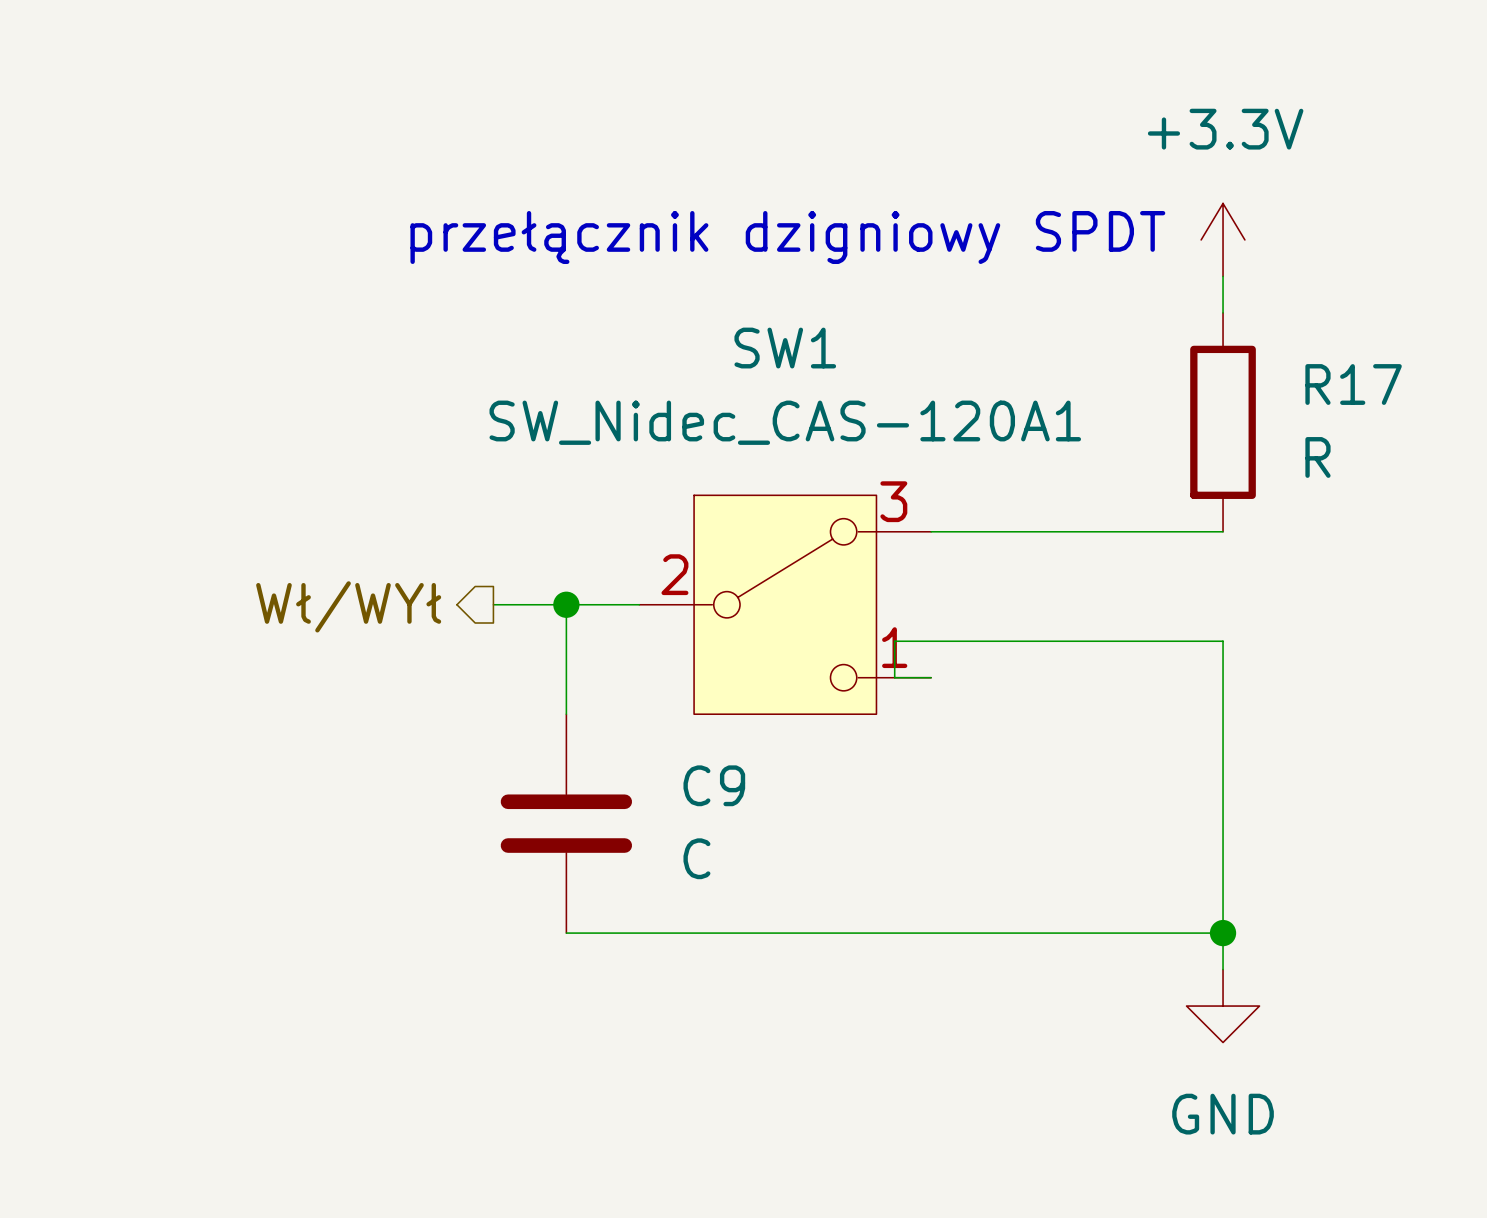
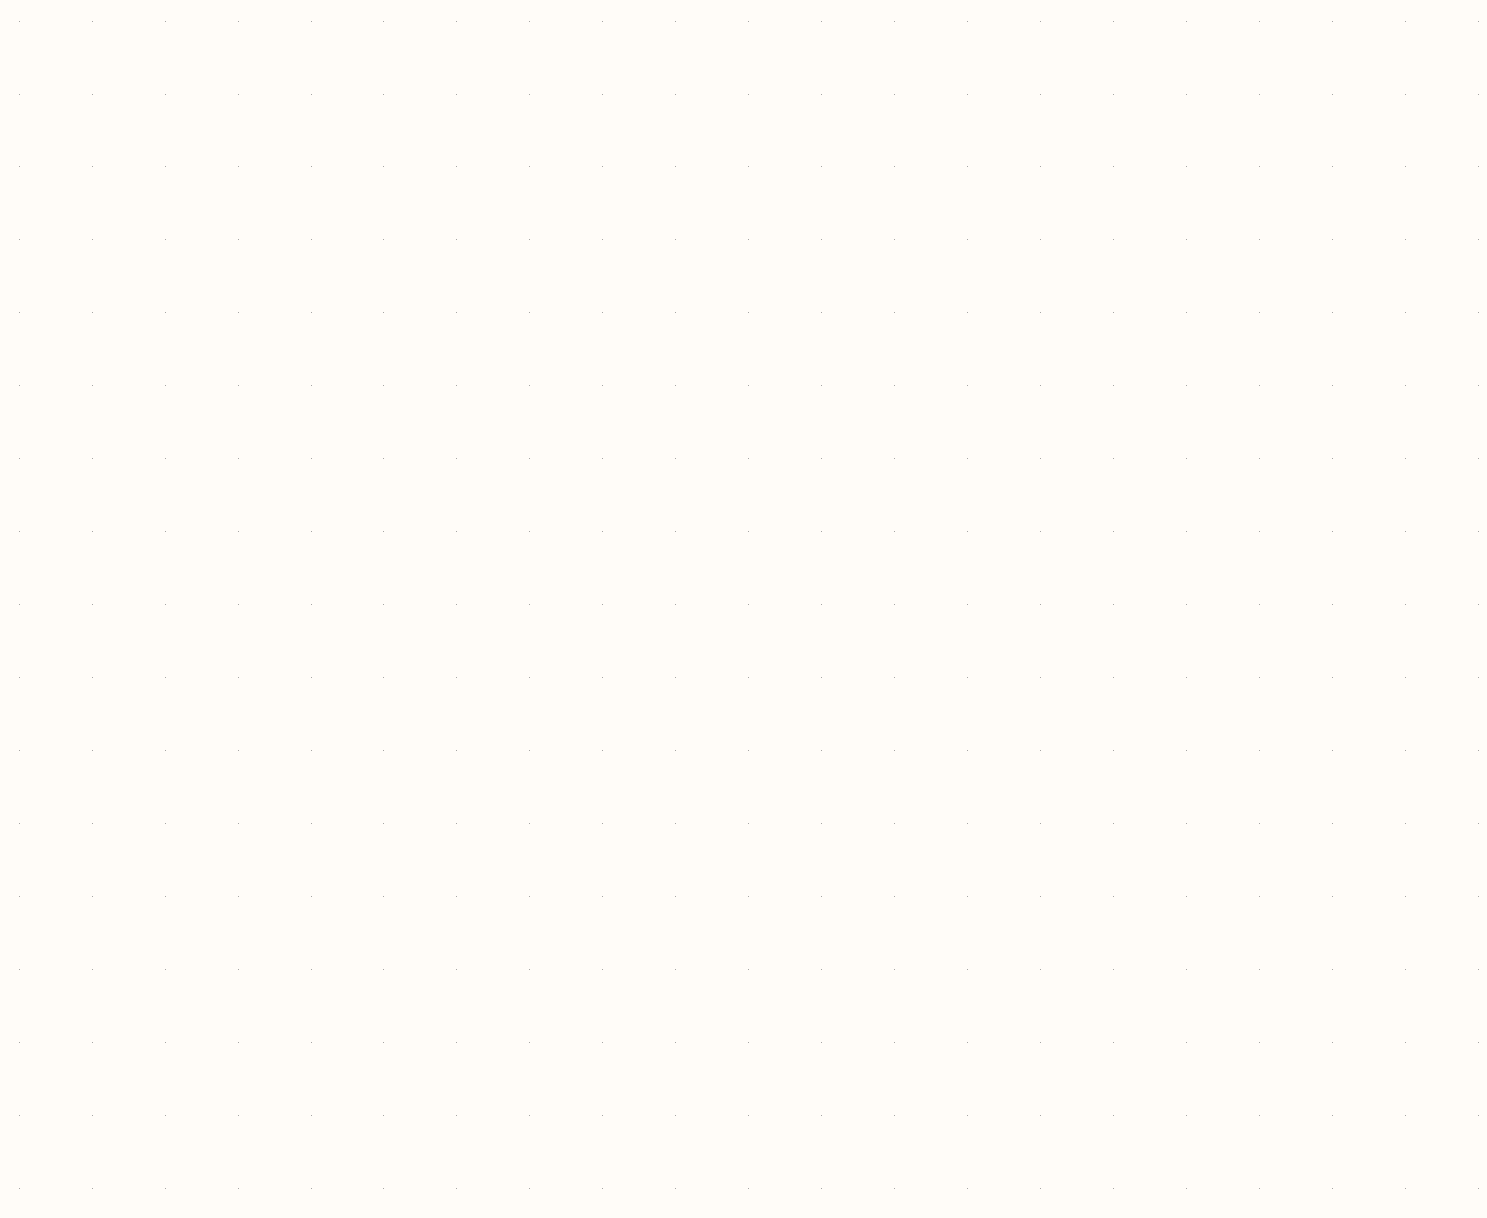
text: przełącznik dzigniowy SPDT (787, 237) -> none
power symbol: +3.3V (1223, 239) -> none
wire: (1223, 276) (1223, 312) -> none
R17: R (1223, 422) -> none
wire: (931, 531) (1223, 531) -> none
wire: (493, 604) (639, 604) -> none
wire: (566, 604) (566, 714) -> none
junction: (566, 604) -> none
SW1: SW_Nidec_CAS-120A1 (785, 604) -> none
hierarchical label: Wł/WYł (348, 606) -> none
wire: (931, 677) (894, 677) (894, 641) (1223, 641) (1223, 969) -> none
C9: C (566, 823) -> none
wire: (566, 933) (1223, 933) -> none
junction: (1223, 933) -> none
power symbol: GND (1223, 1006) -> none

